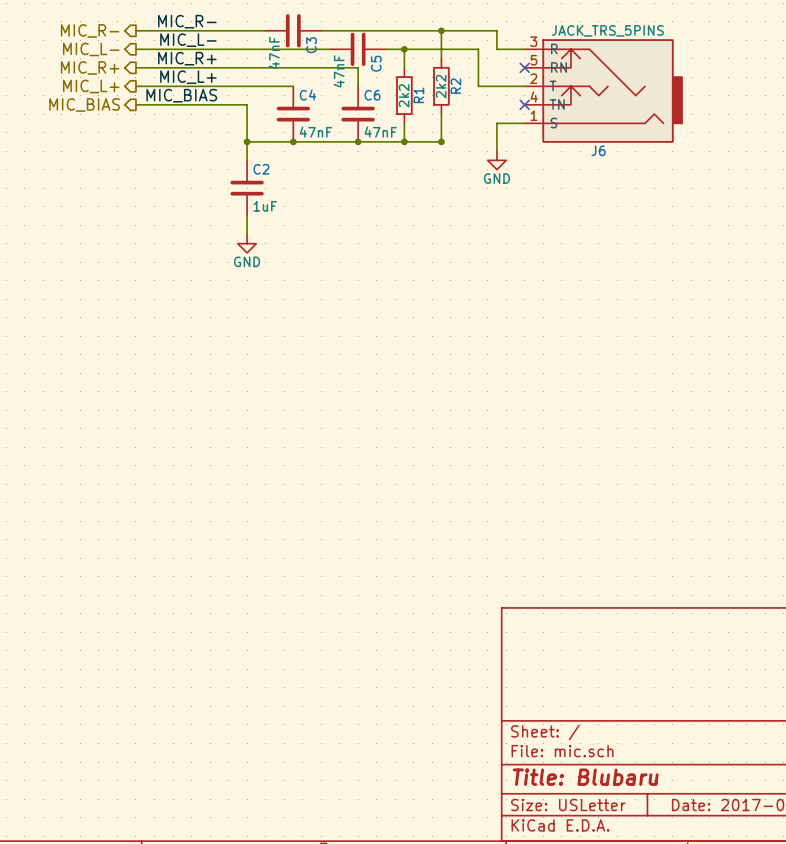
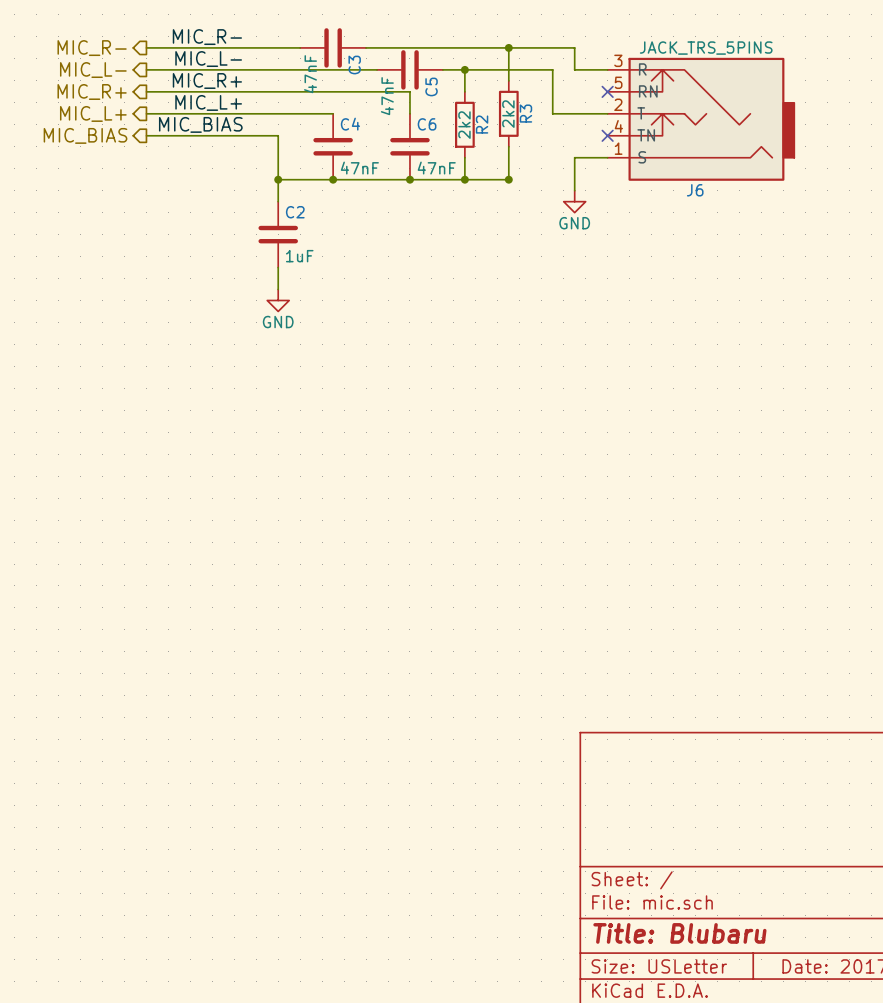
R2 name: R2 (455, 86) -> R3 (525, 113)
R1 name: R1 (418, 95) -> R2 (482, 124)

